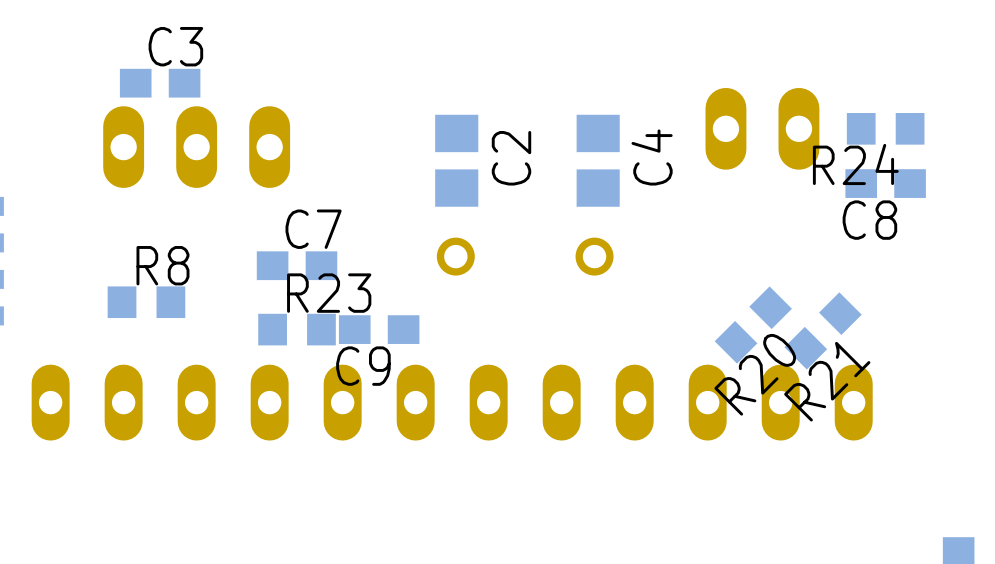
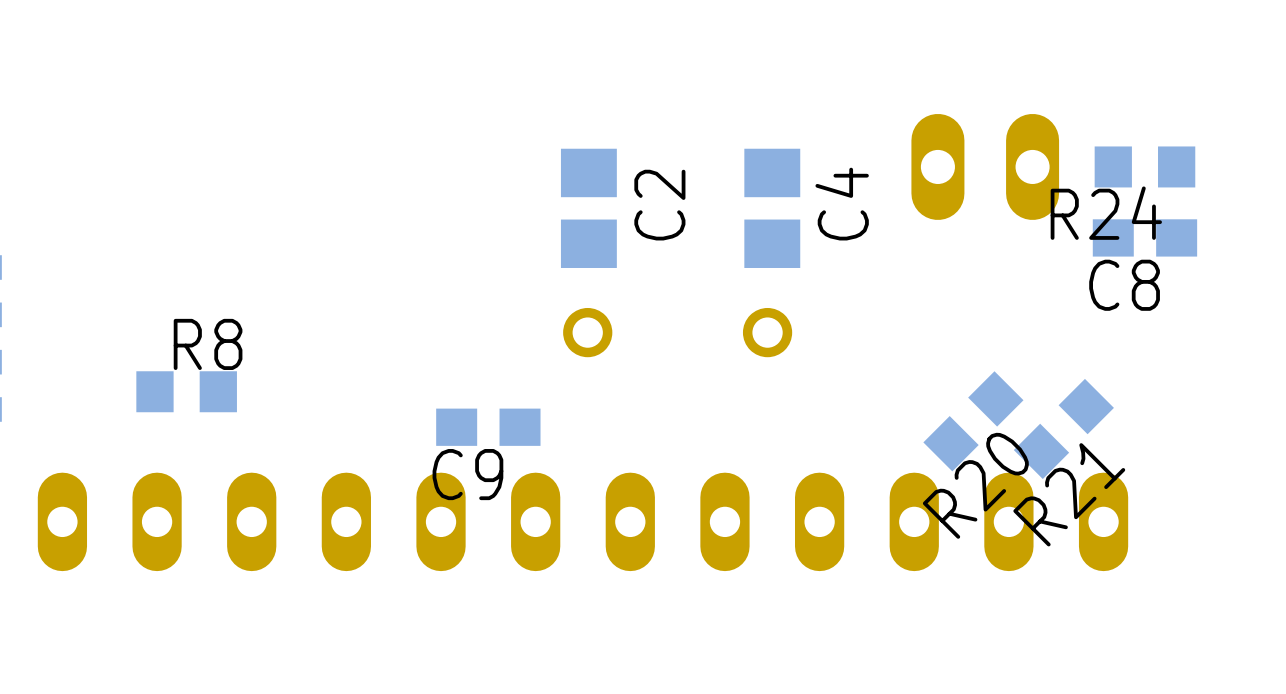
C3: (160, 83) -> none
part: (196, 147) -> none
C7: (297, 265) -> none
R23: (297, 329) -> none

